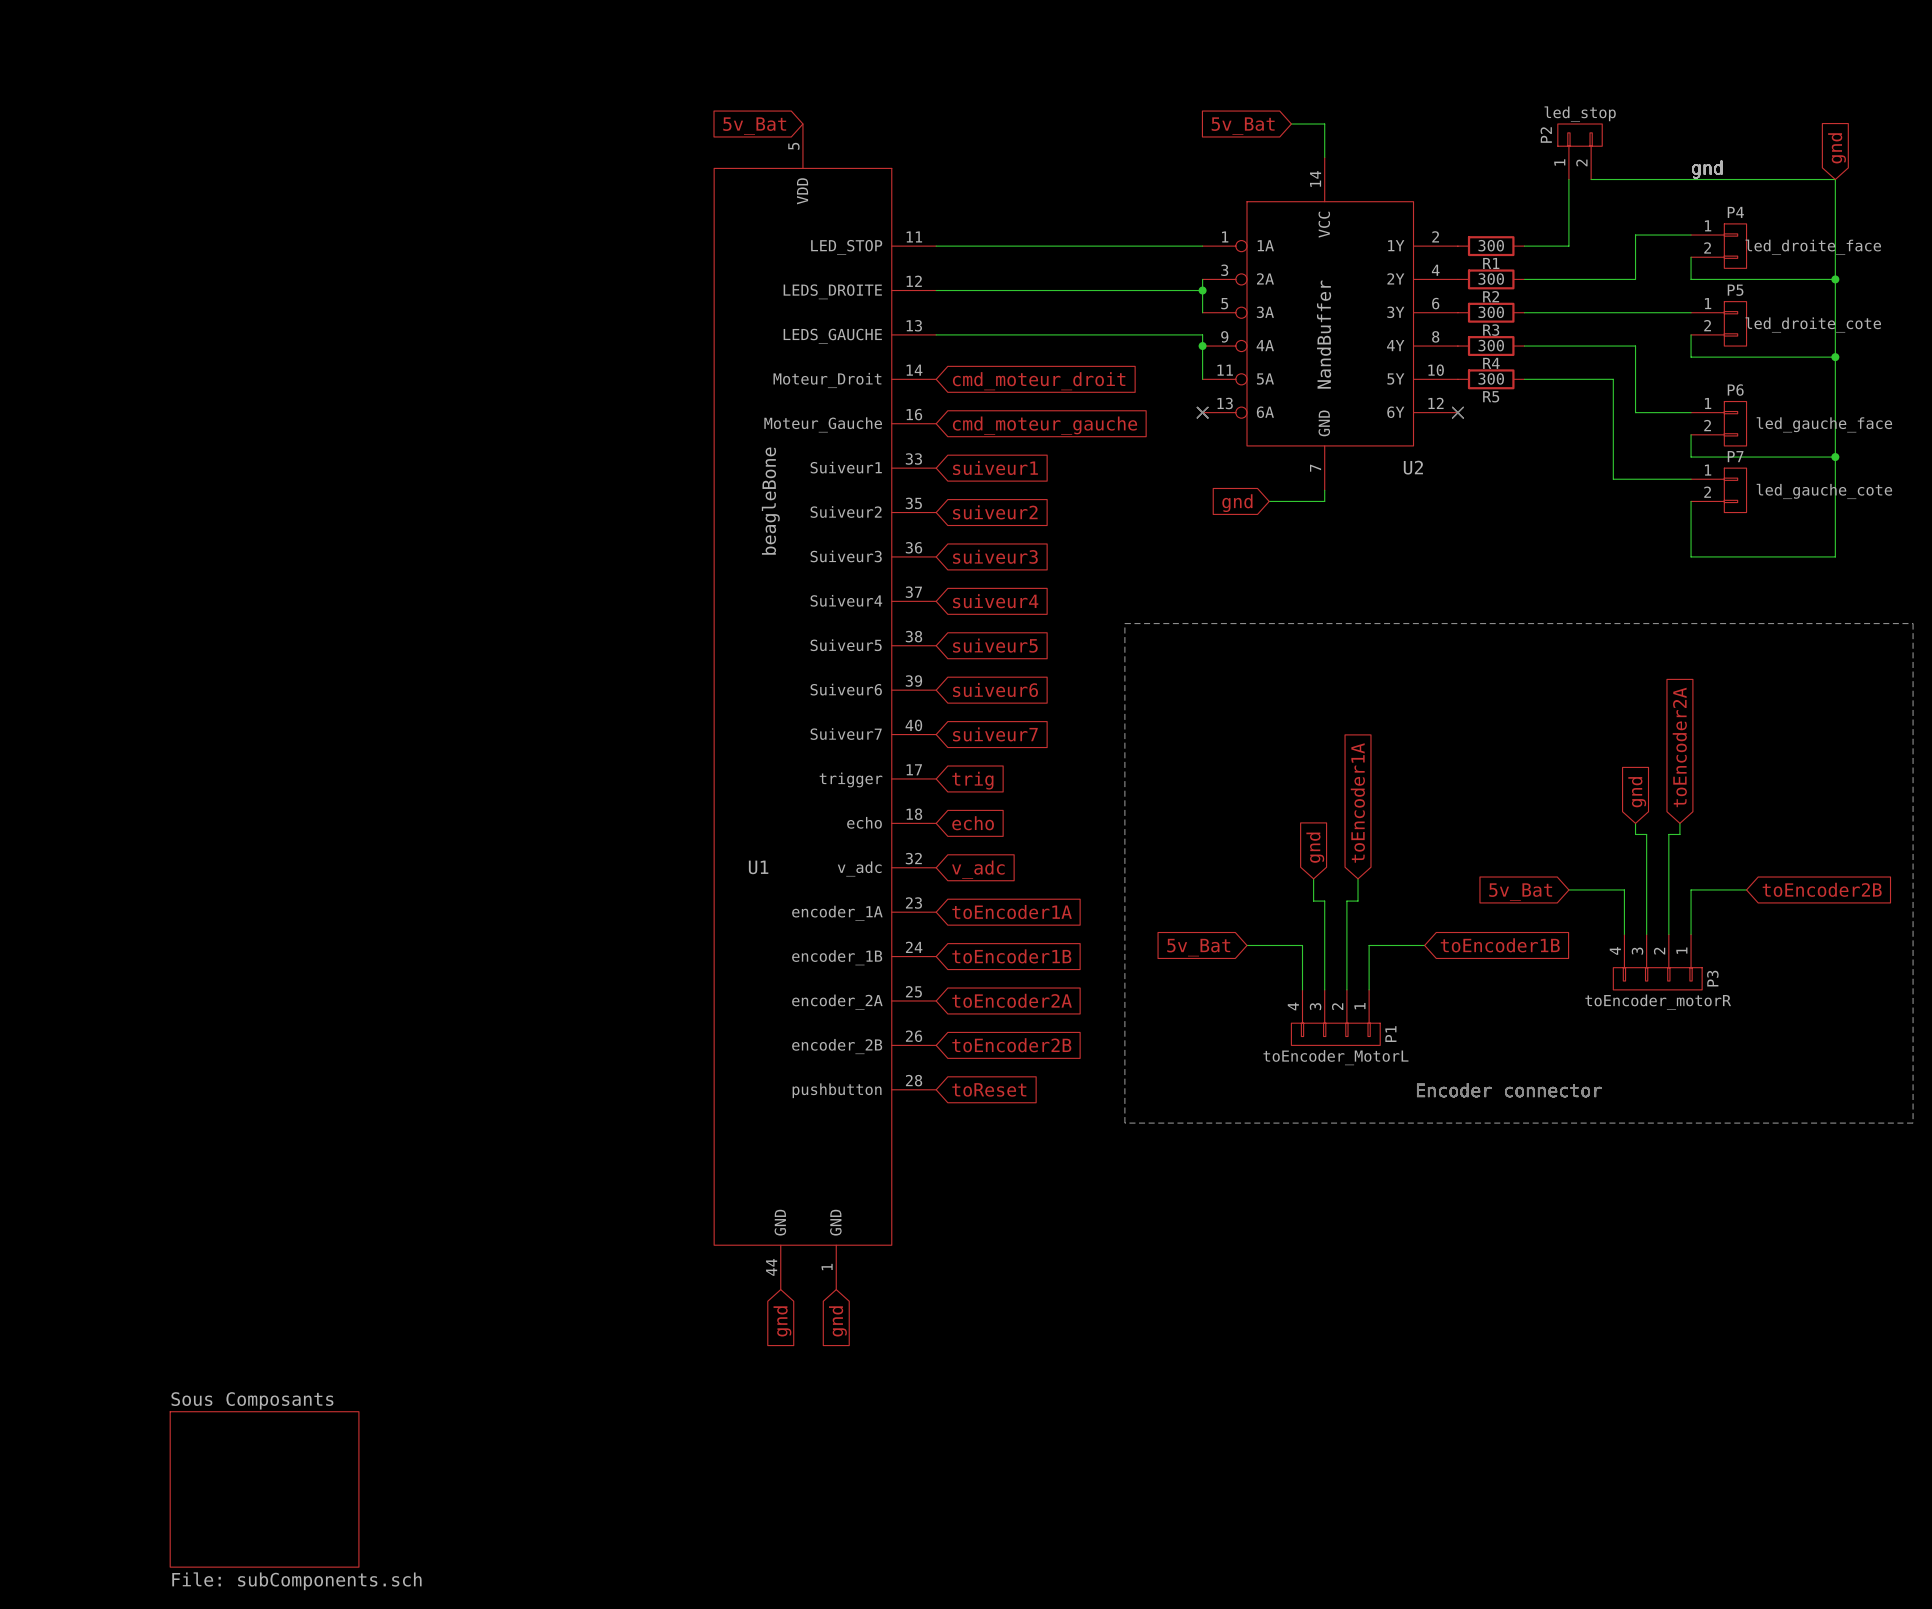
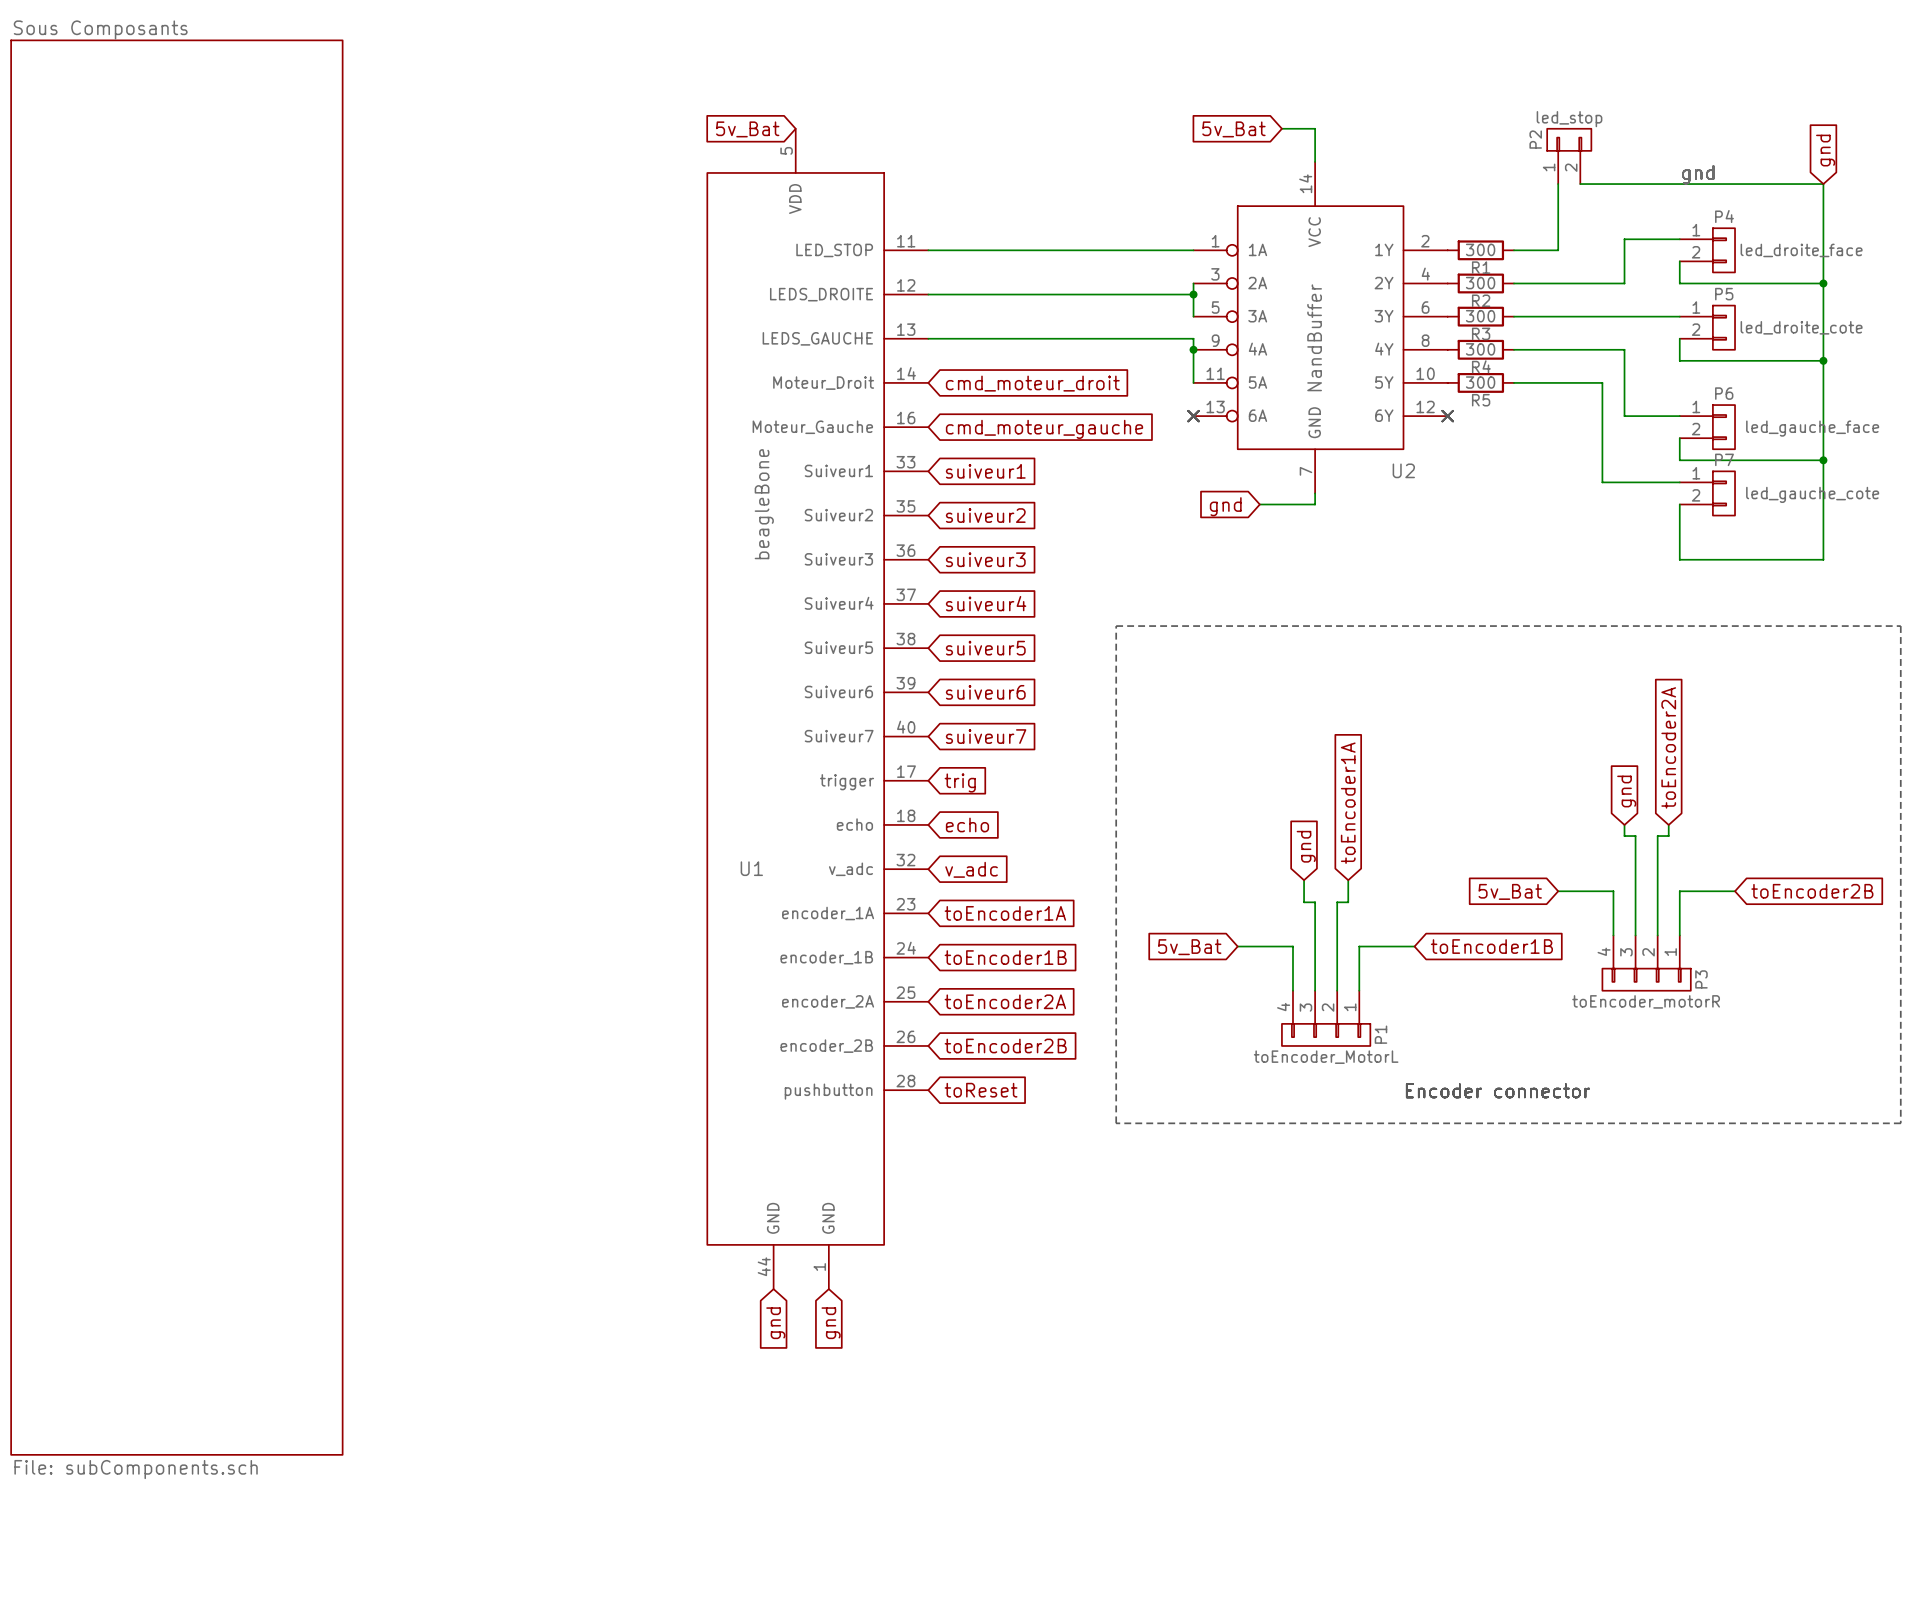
sheet Sous Composants: none -> File: subComponents.sch (176, 747)
sheet Sous Composants: File: subComponents.sch (264, 1489) -> none

